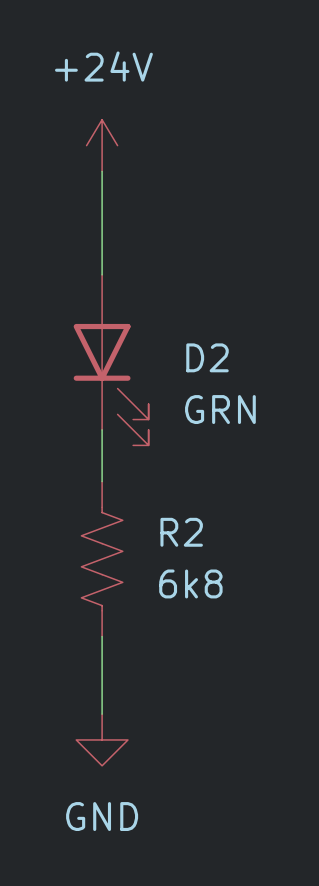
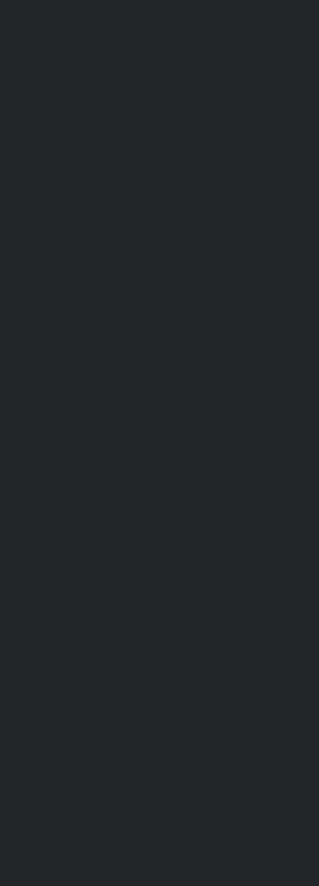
power symbol: +24V (102, 145) -> none
wire: (102, 171) (102, 274) -> none
D2: GRN (111, 360) -> none
wire: (102, 429) (102, 481) -> none
R2: 6k8 (102, 559) -> none
wire: (102, 636) (102, 714) -> none
power symbol: GND (102, 739) -> none

